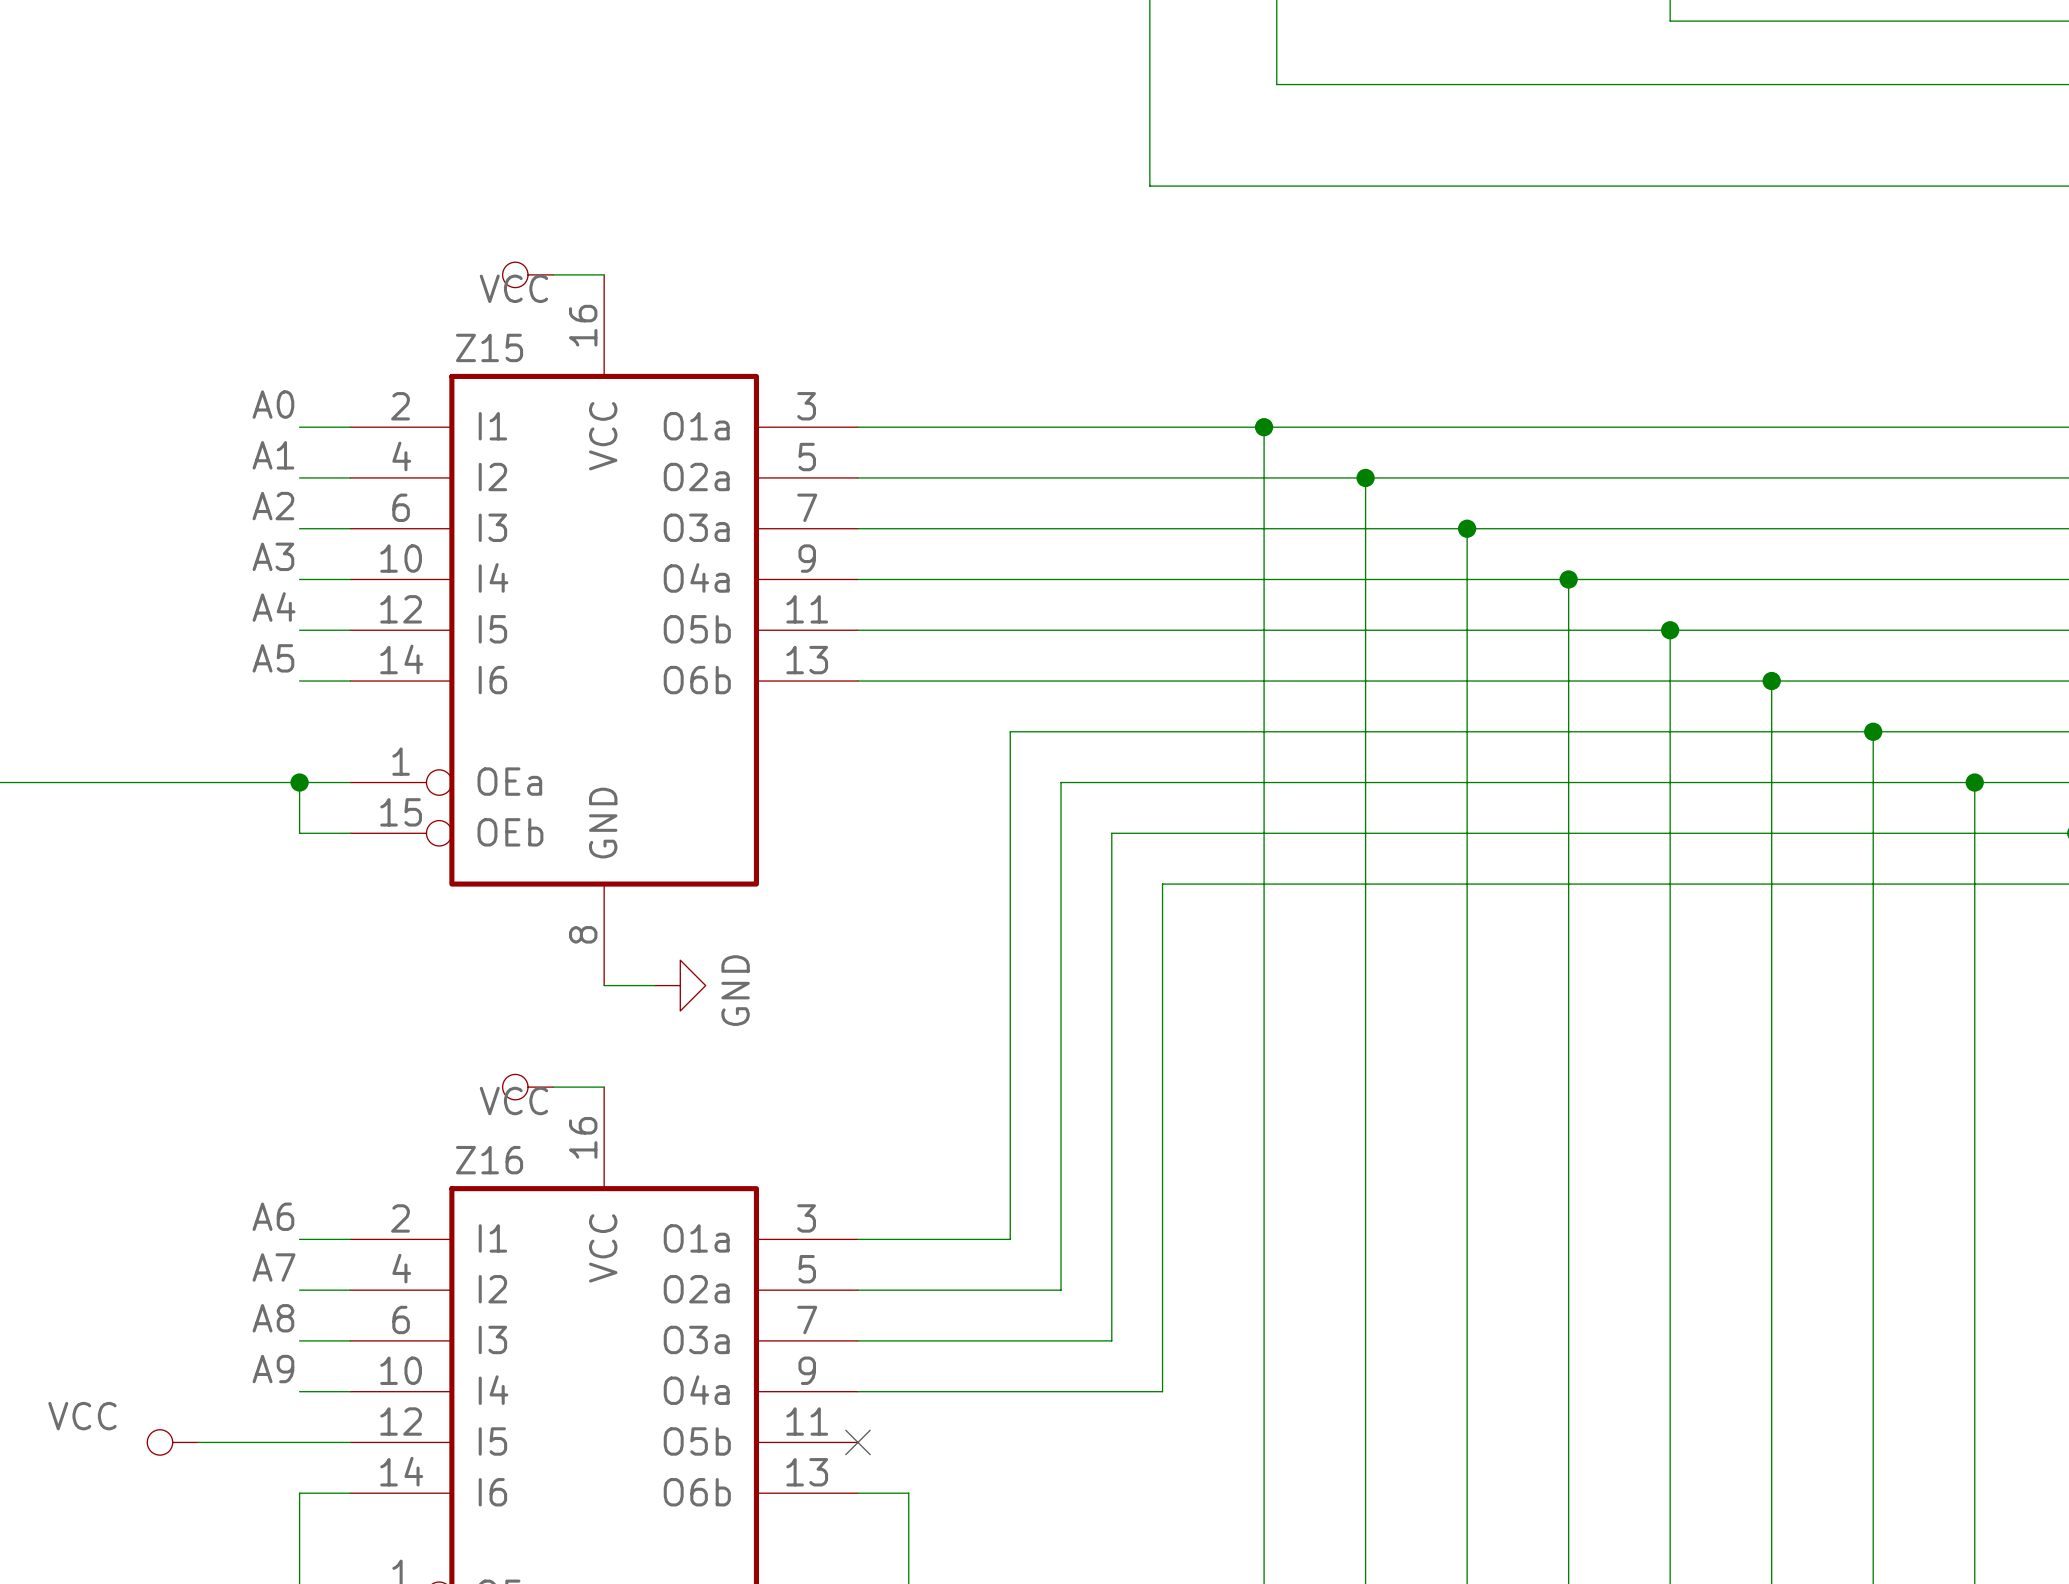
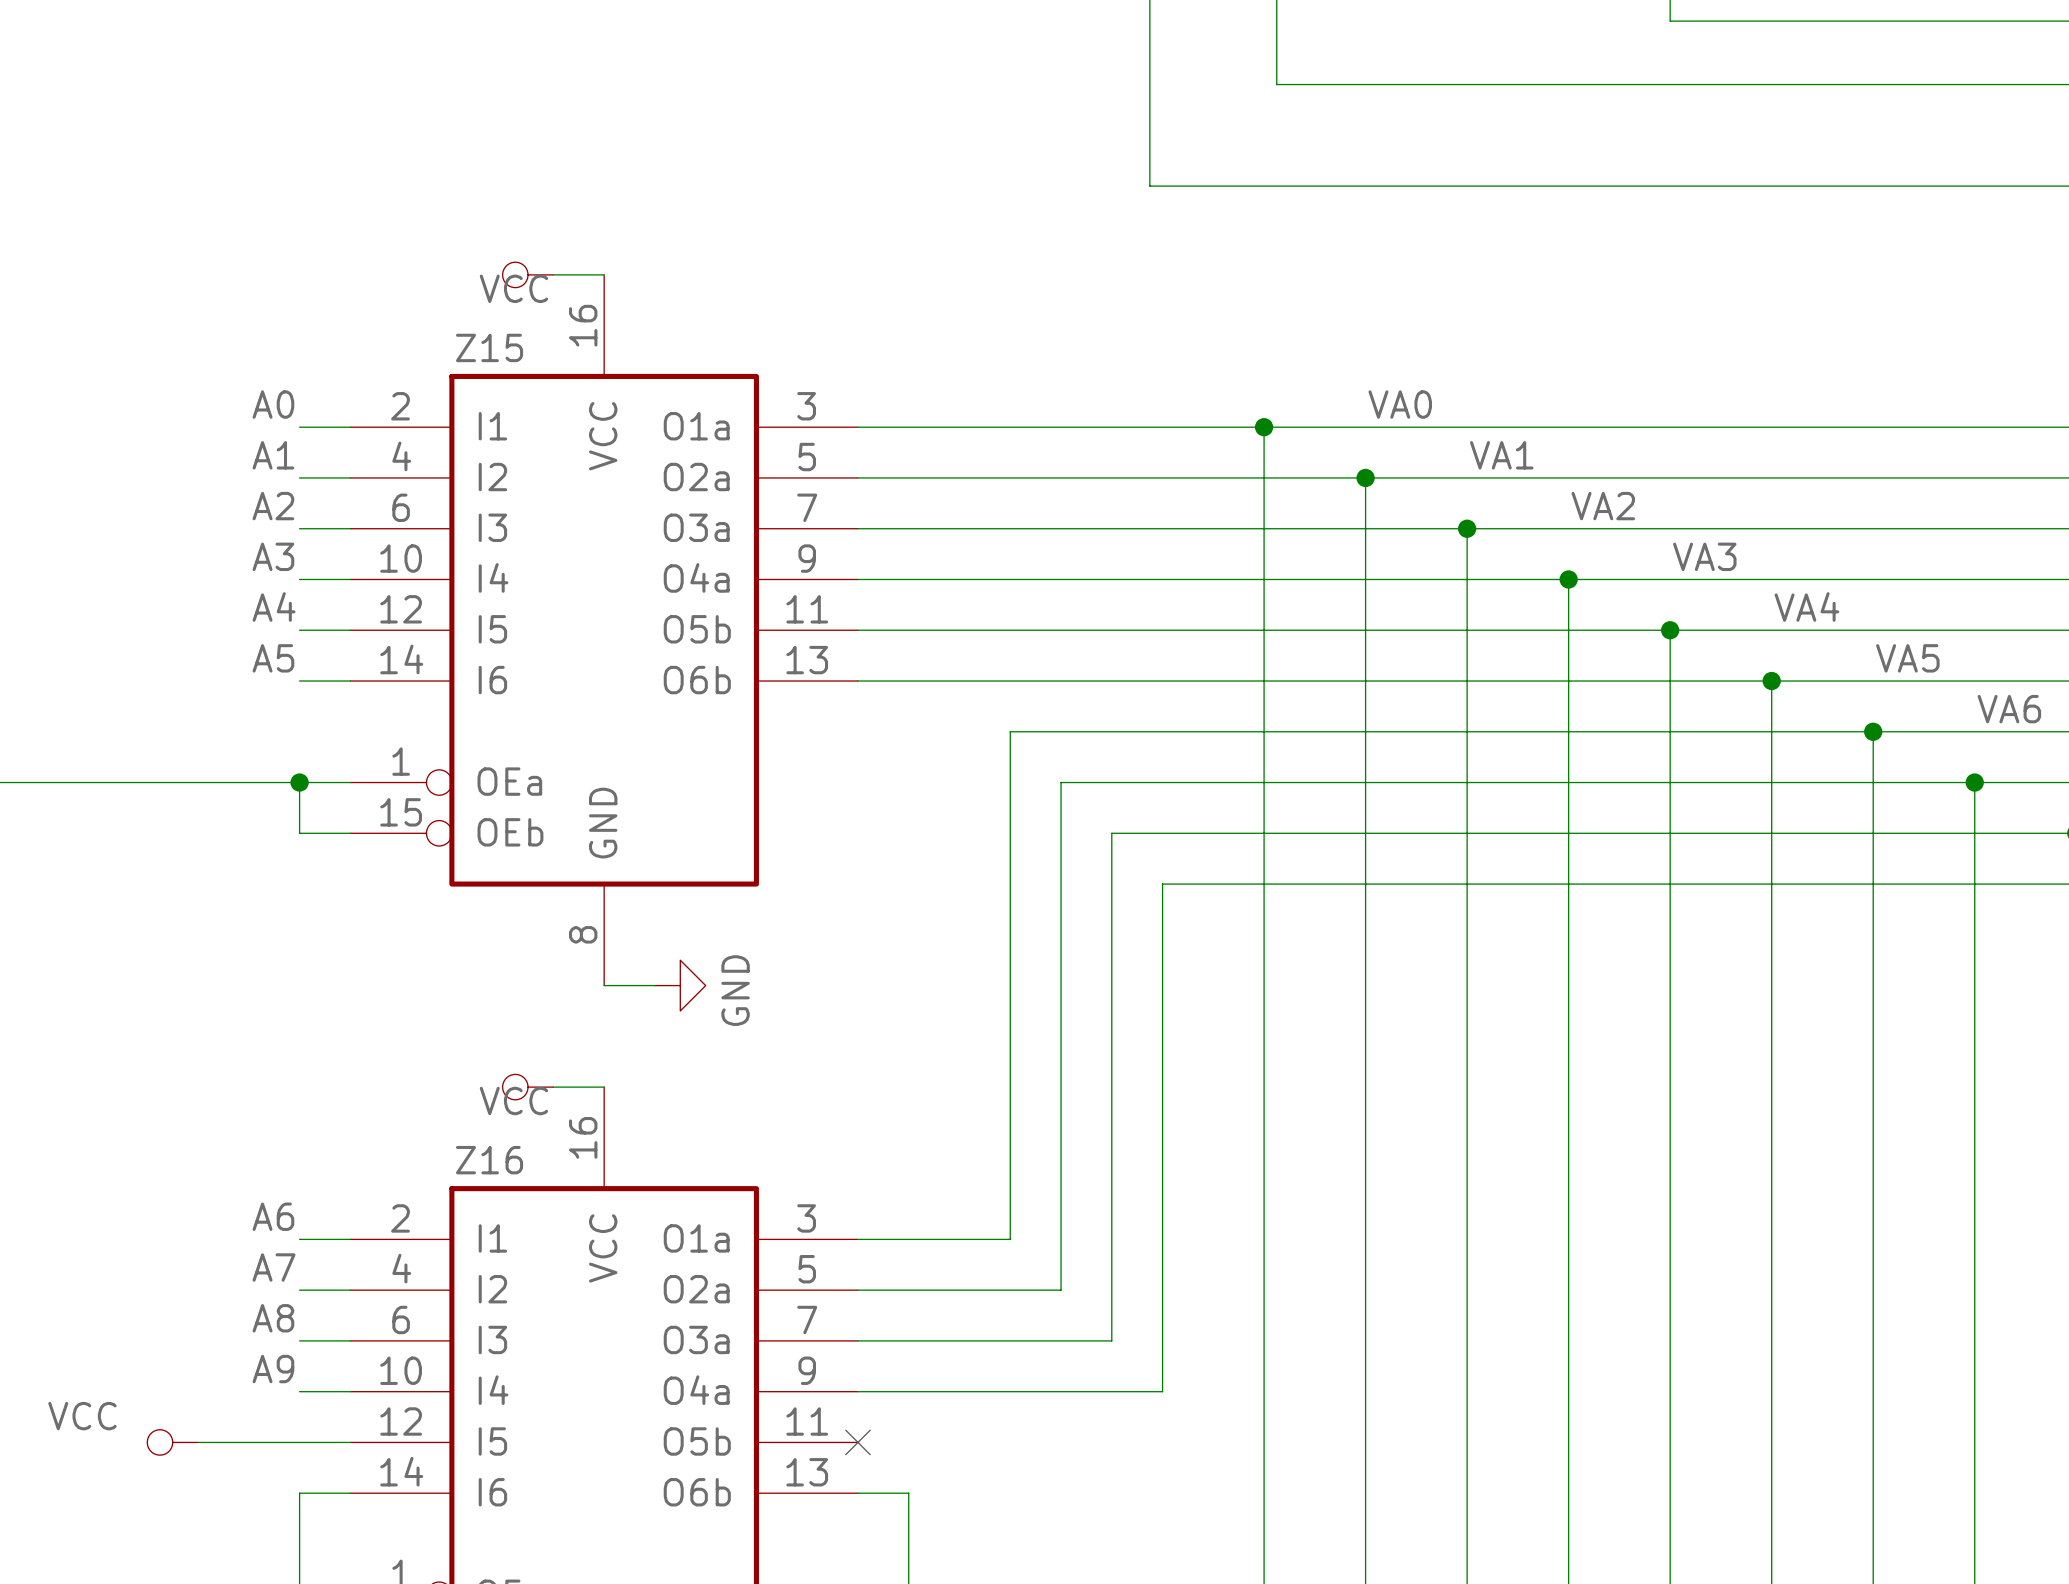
label: none -> VA0 (1400, 404)
label: none -> VA1 (1501, 455)
label: none -> VA2 (1603, 506)
label: none -> VA3 (1704, 556)
label: none -> VA4 (1806, 606)
label: none -> VA5 (1907, 658)
label: none -> VA6 (2009, 709)

